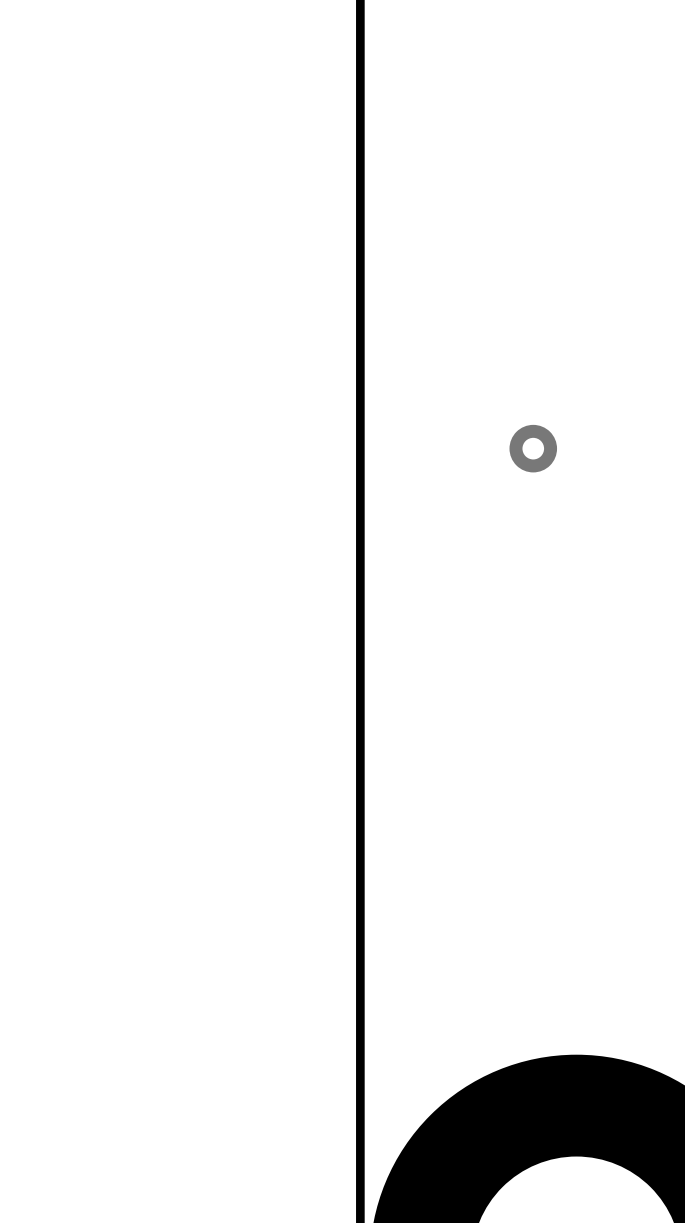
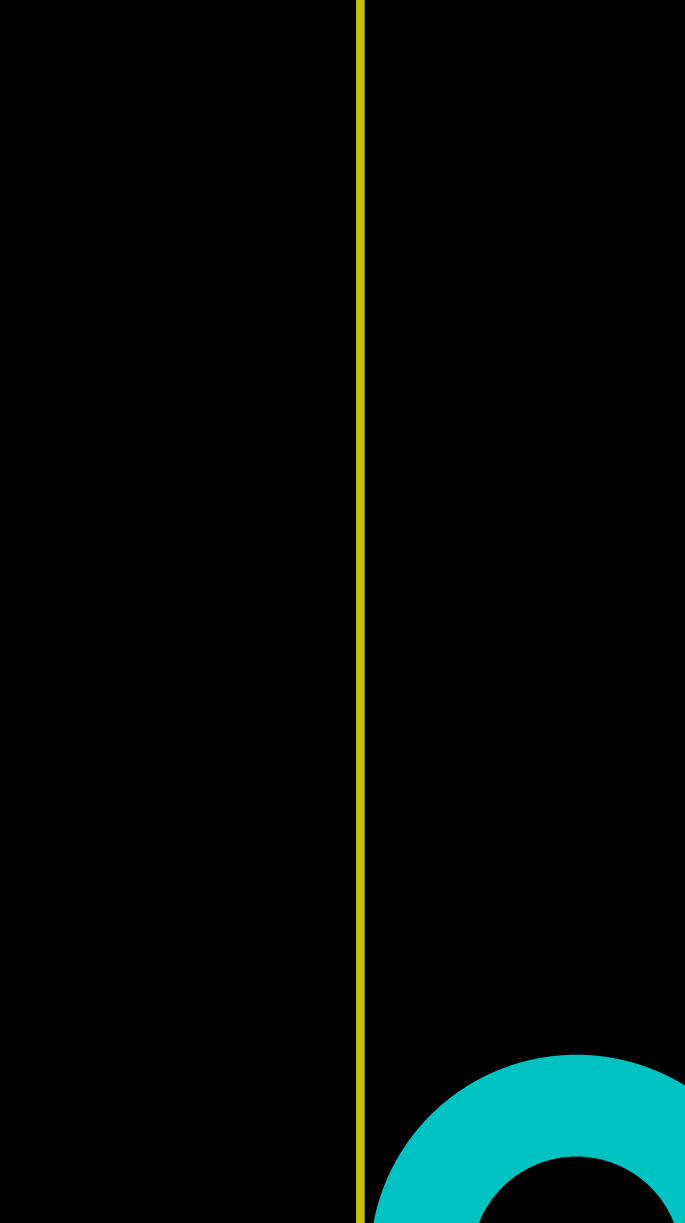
via: (533, 448) -> none

